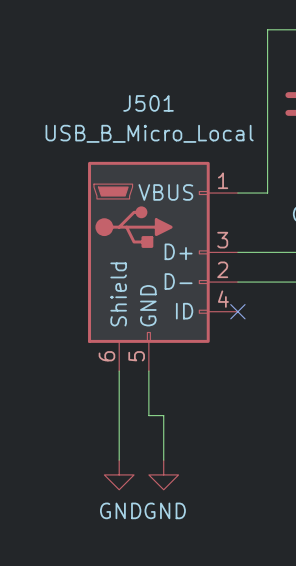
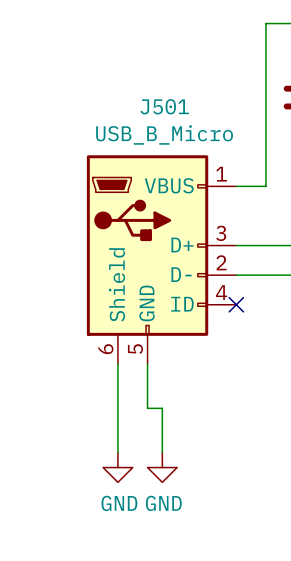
J501 name position: J501 (148, 103) -> J501 (164, 106)
J501 value: USB_B_Micro_Local (149, 133) -> USB_B_Micro (164, 134)

